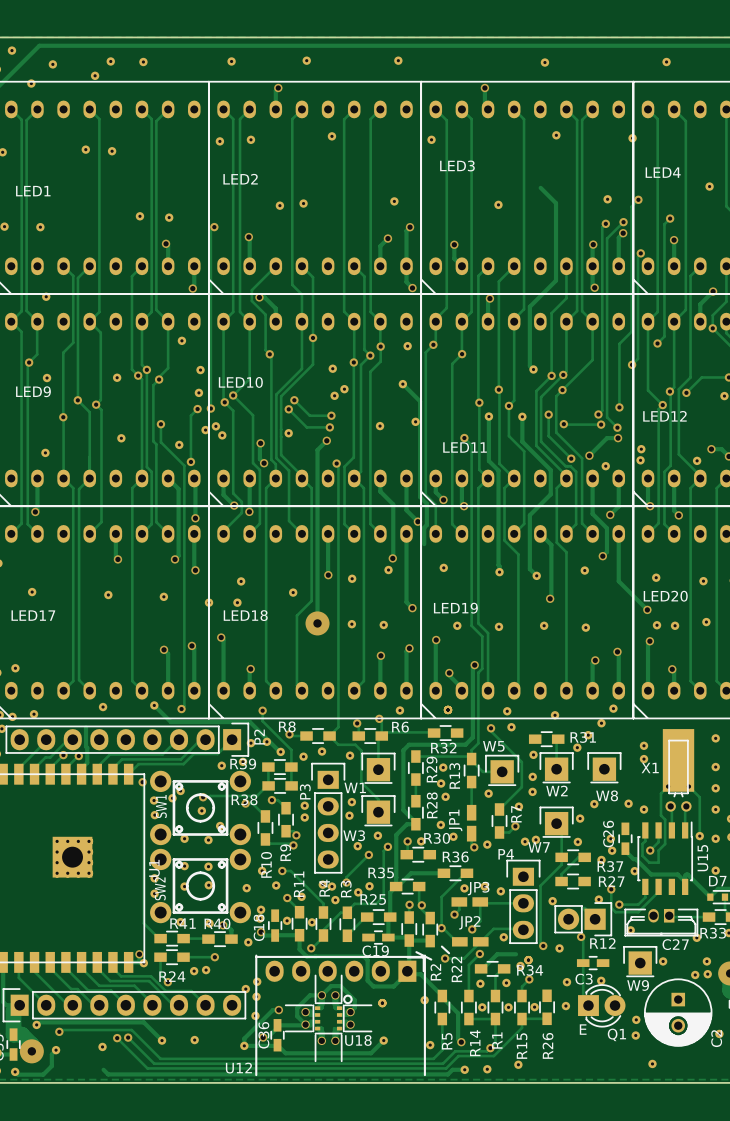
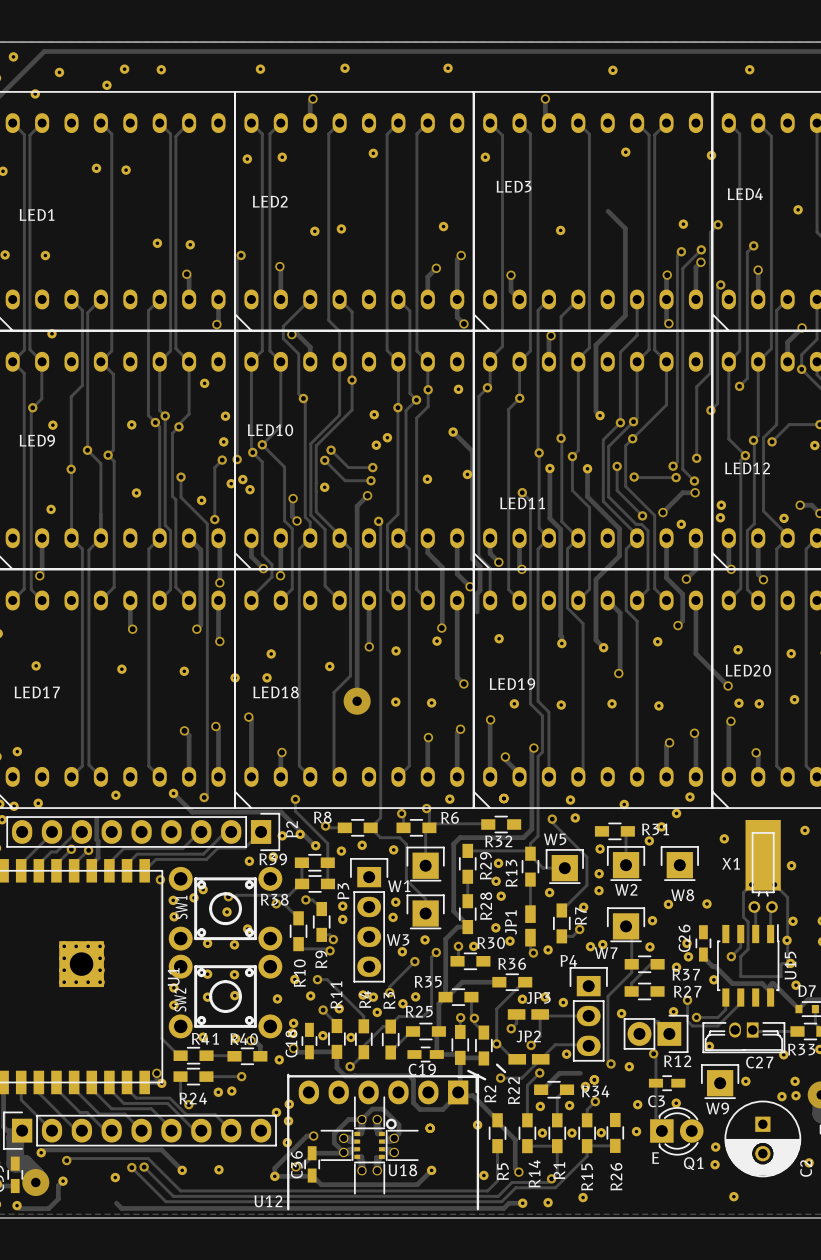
part: (643, 759) -> none
part: (715, 767) -> none
part: none -> (791, 865)
part: (715, 788) -> none
track: (699, 797) (699, 836) -> (787, 896) (787, 960) (790, 963) (781, 964) (781, 976) (740, 976) (740, 970)
part: (643, 809) -> none
part: (715, 809) -> none
part: none -> (793, 921)
track: (645, 830) (642, 855) (649, 862) (658, 862) -> none
part: (715, 838) -> none
part: none -> (790, 963)
part: (715, 870) -> none
part: none -> (796, 985)

